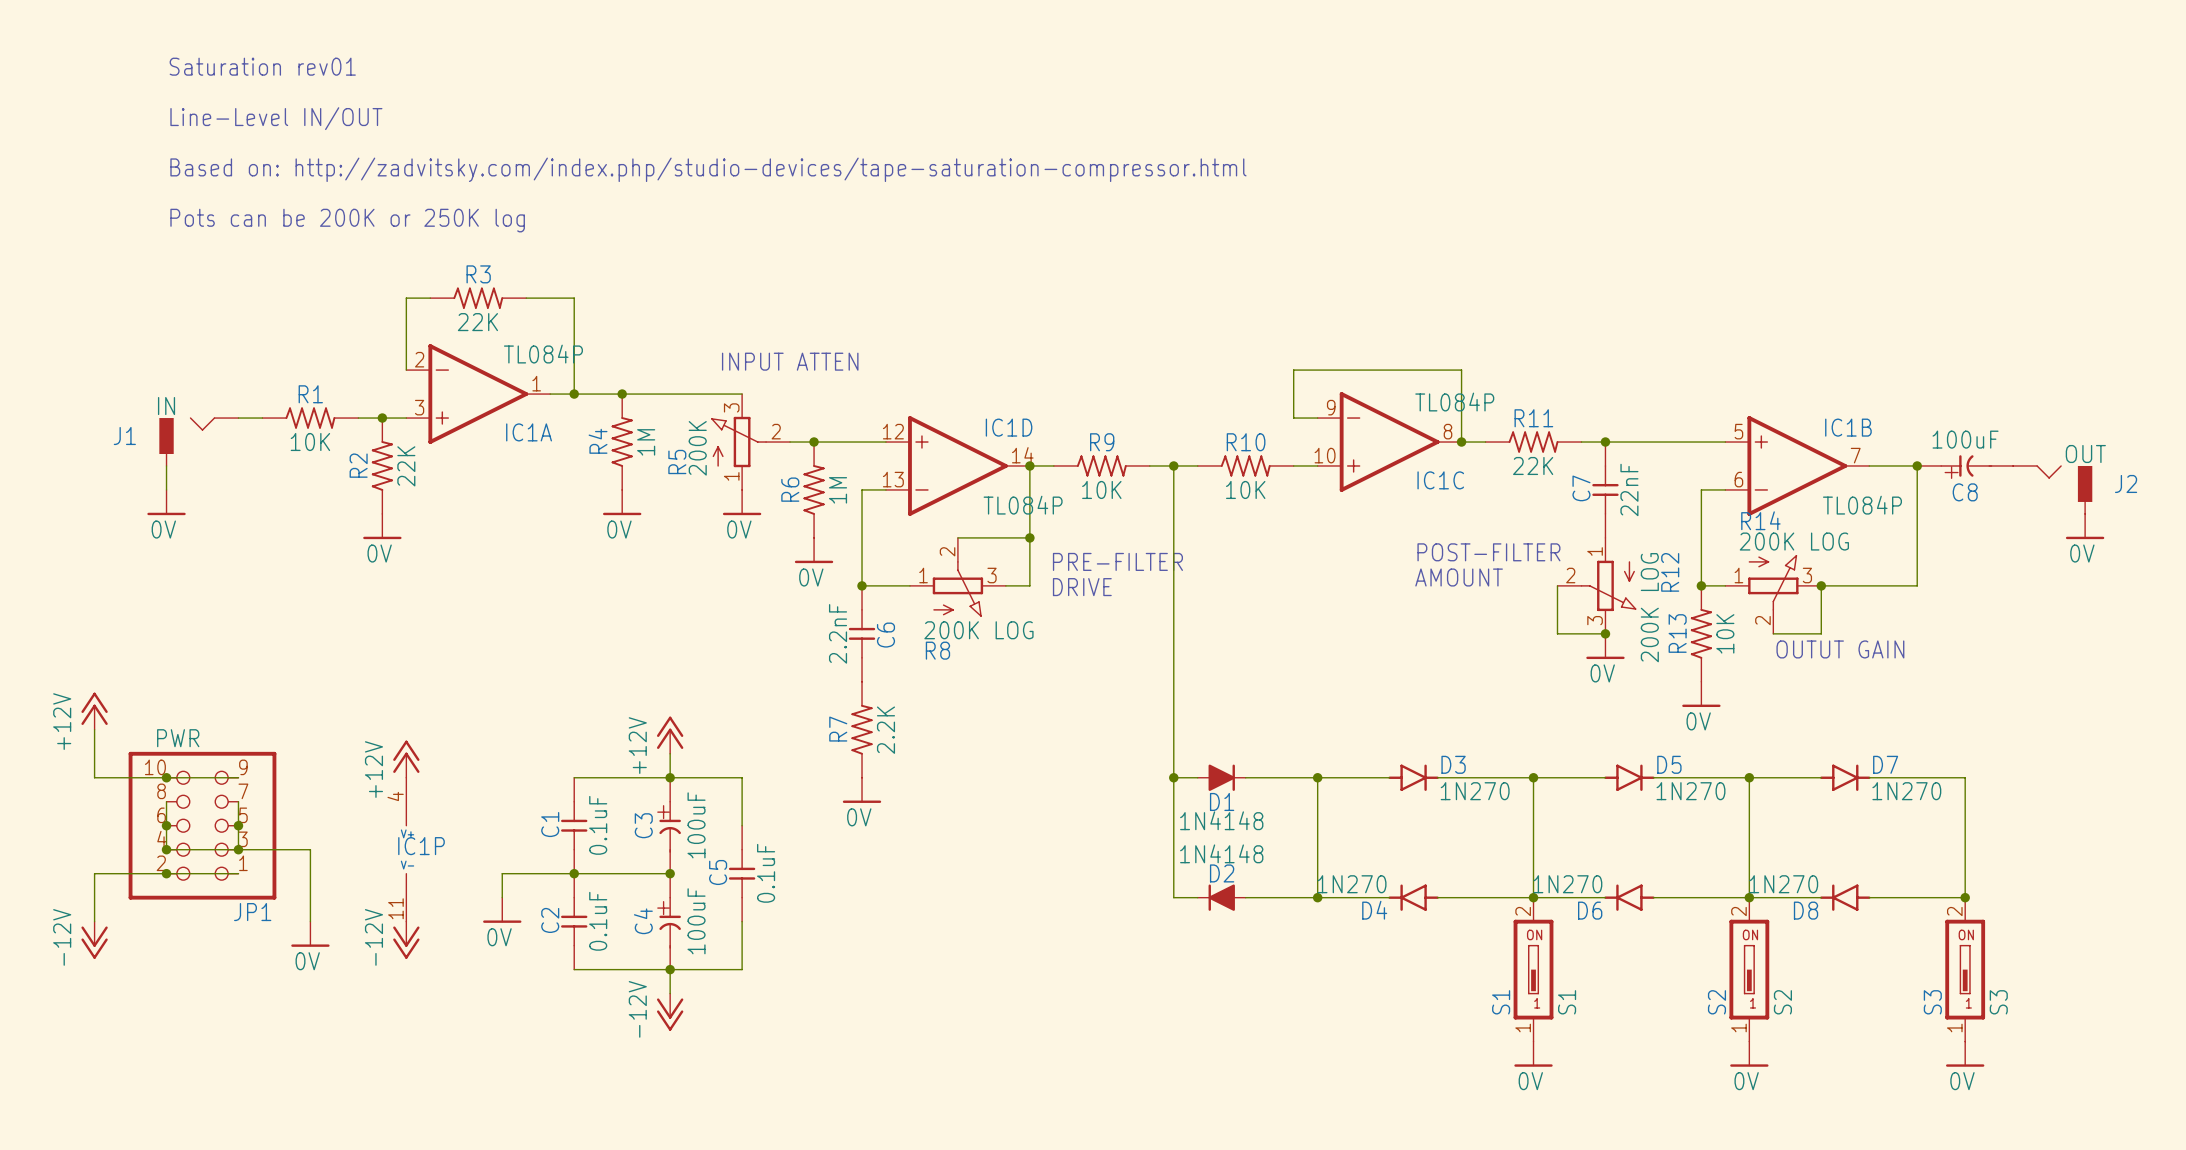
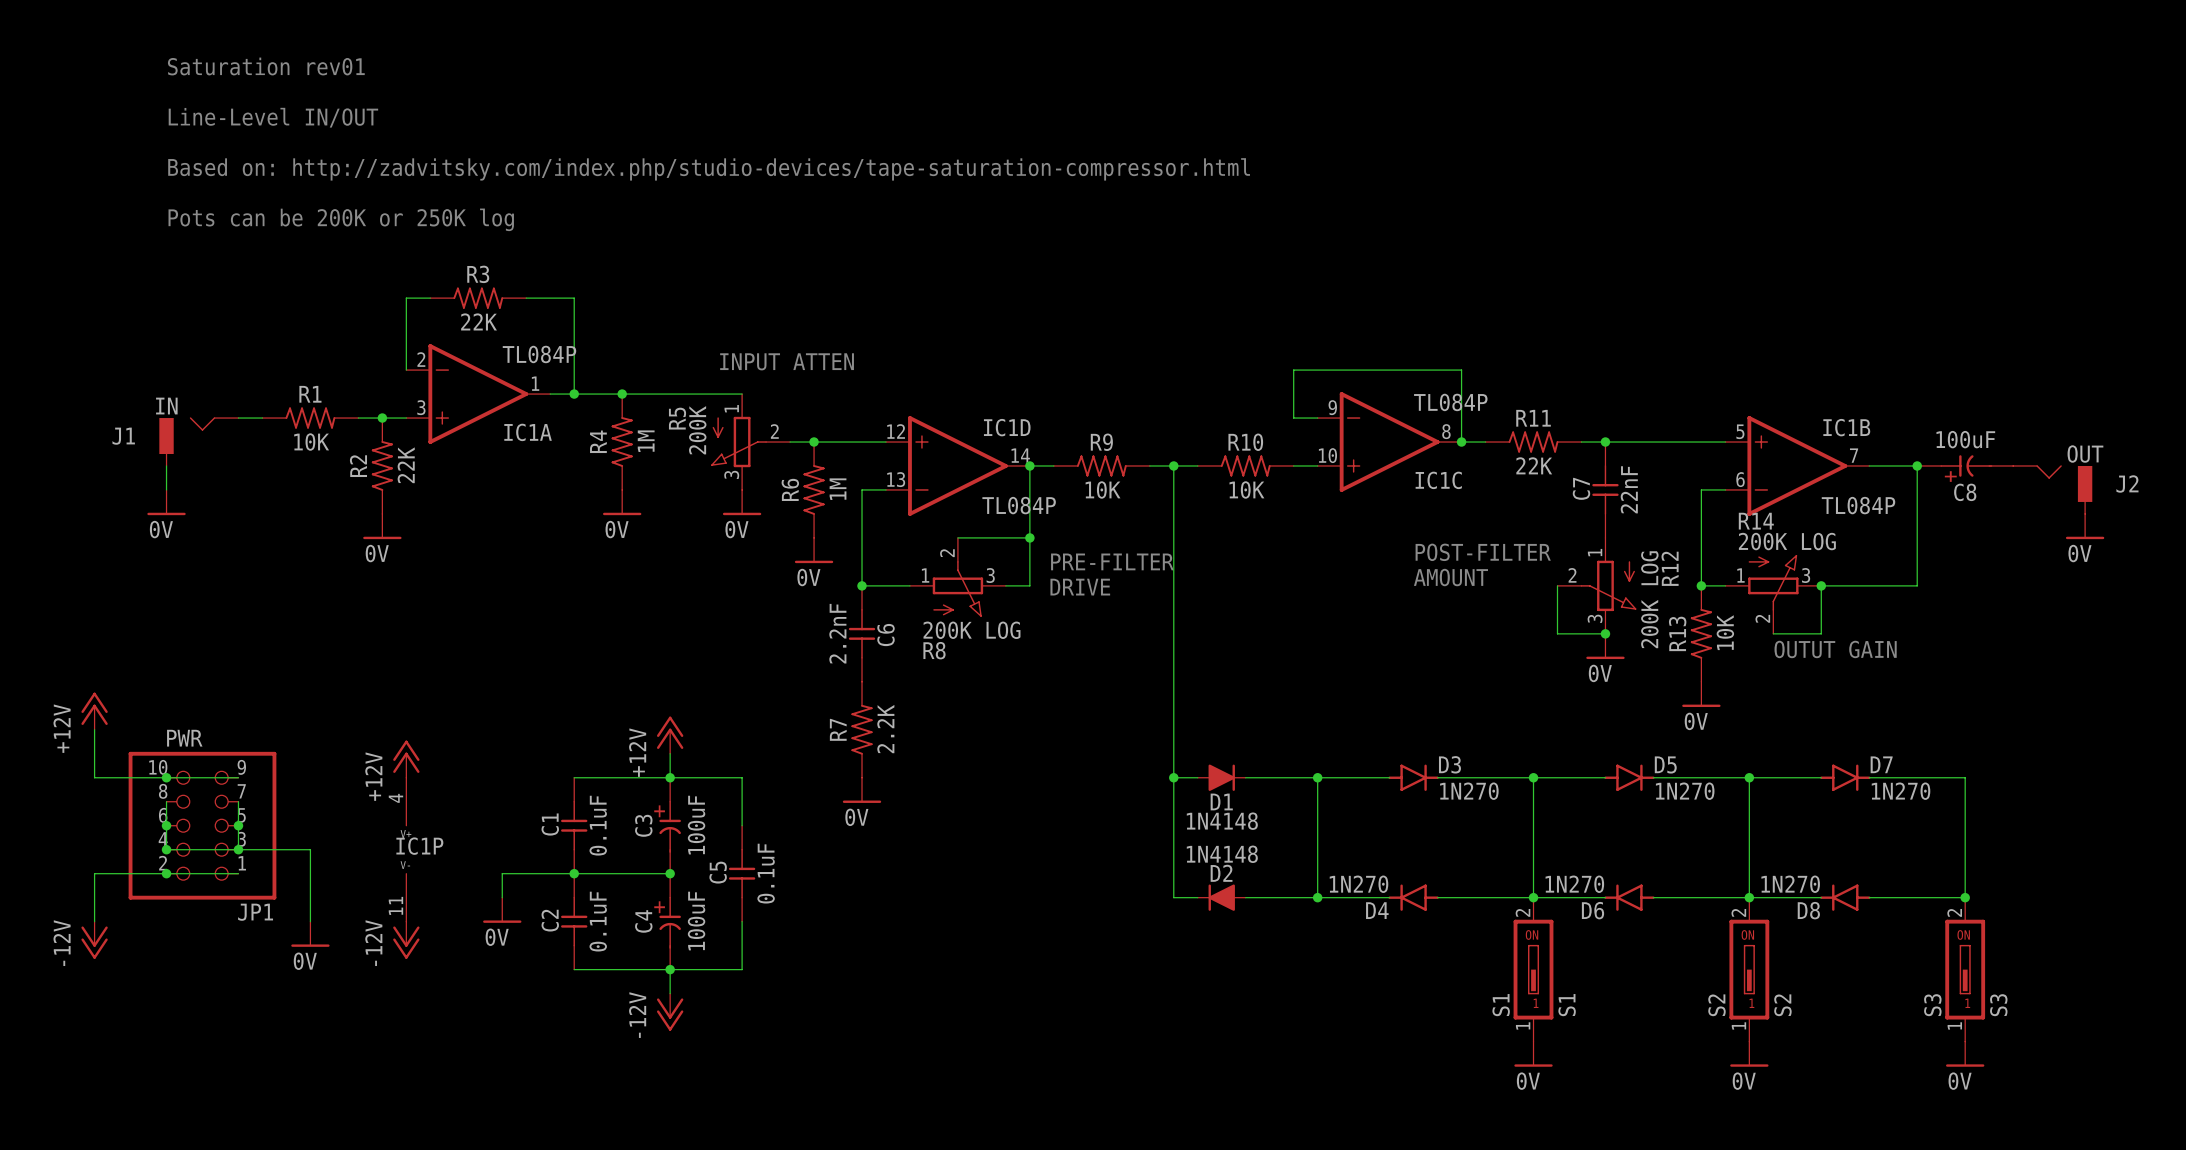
R5 flip: as is (738, 442) -> up-down (738, 442)

